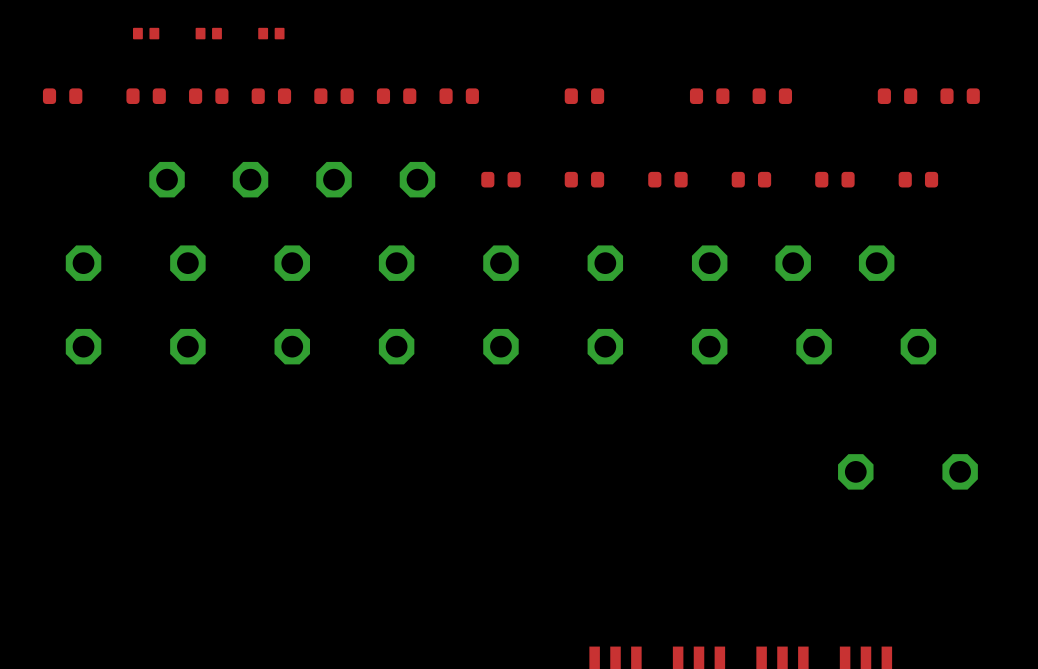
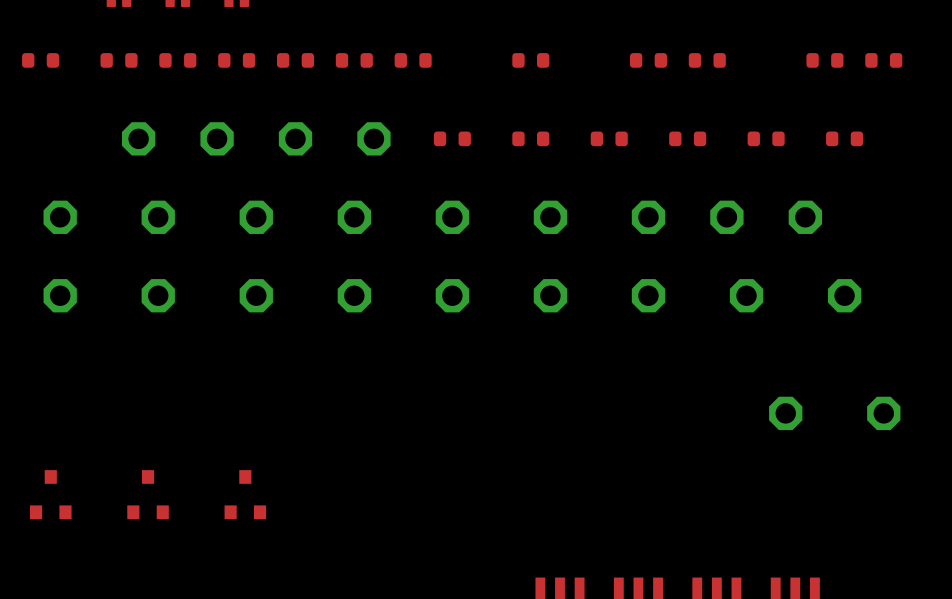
part: none -> (50, 494)
part: none -> (148, 494)
part: none -> (245, 494)

